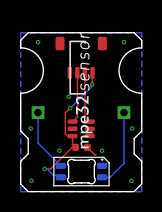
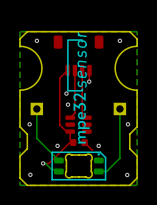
bottom track: (92, 84) (70, 108) -> none
top track: (70, 108) (65, 113) (65, 133) (68, 135) -> (67, 70) (59, 78) (59, 124) (66, 131)

